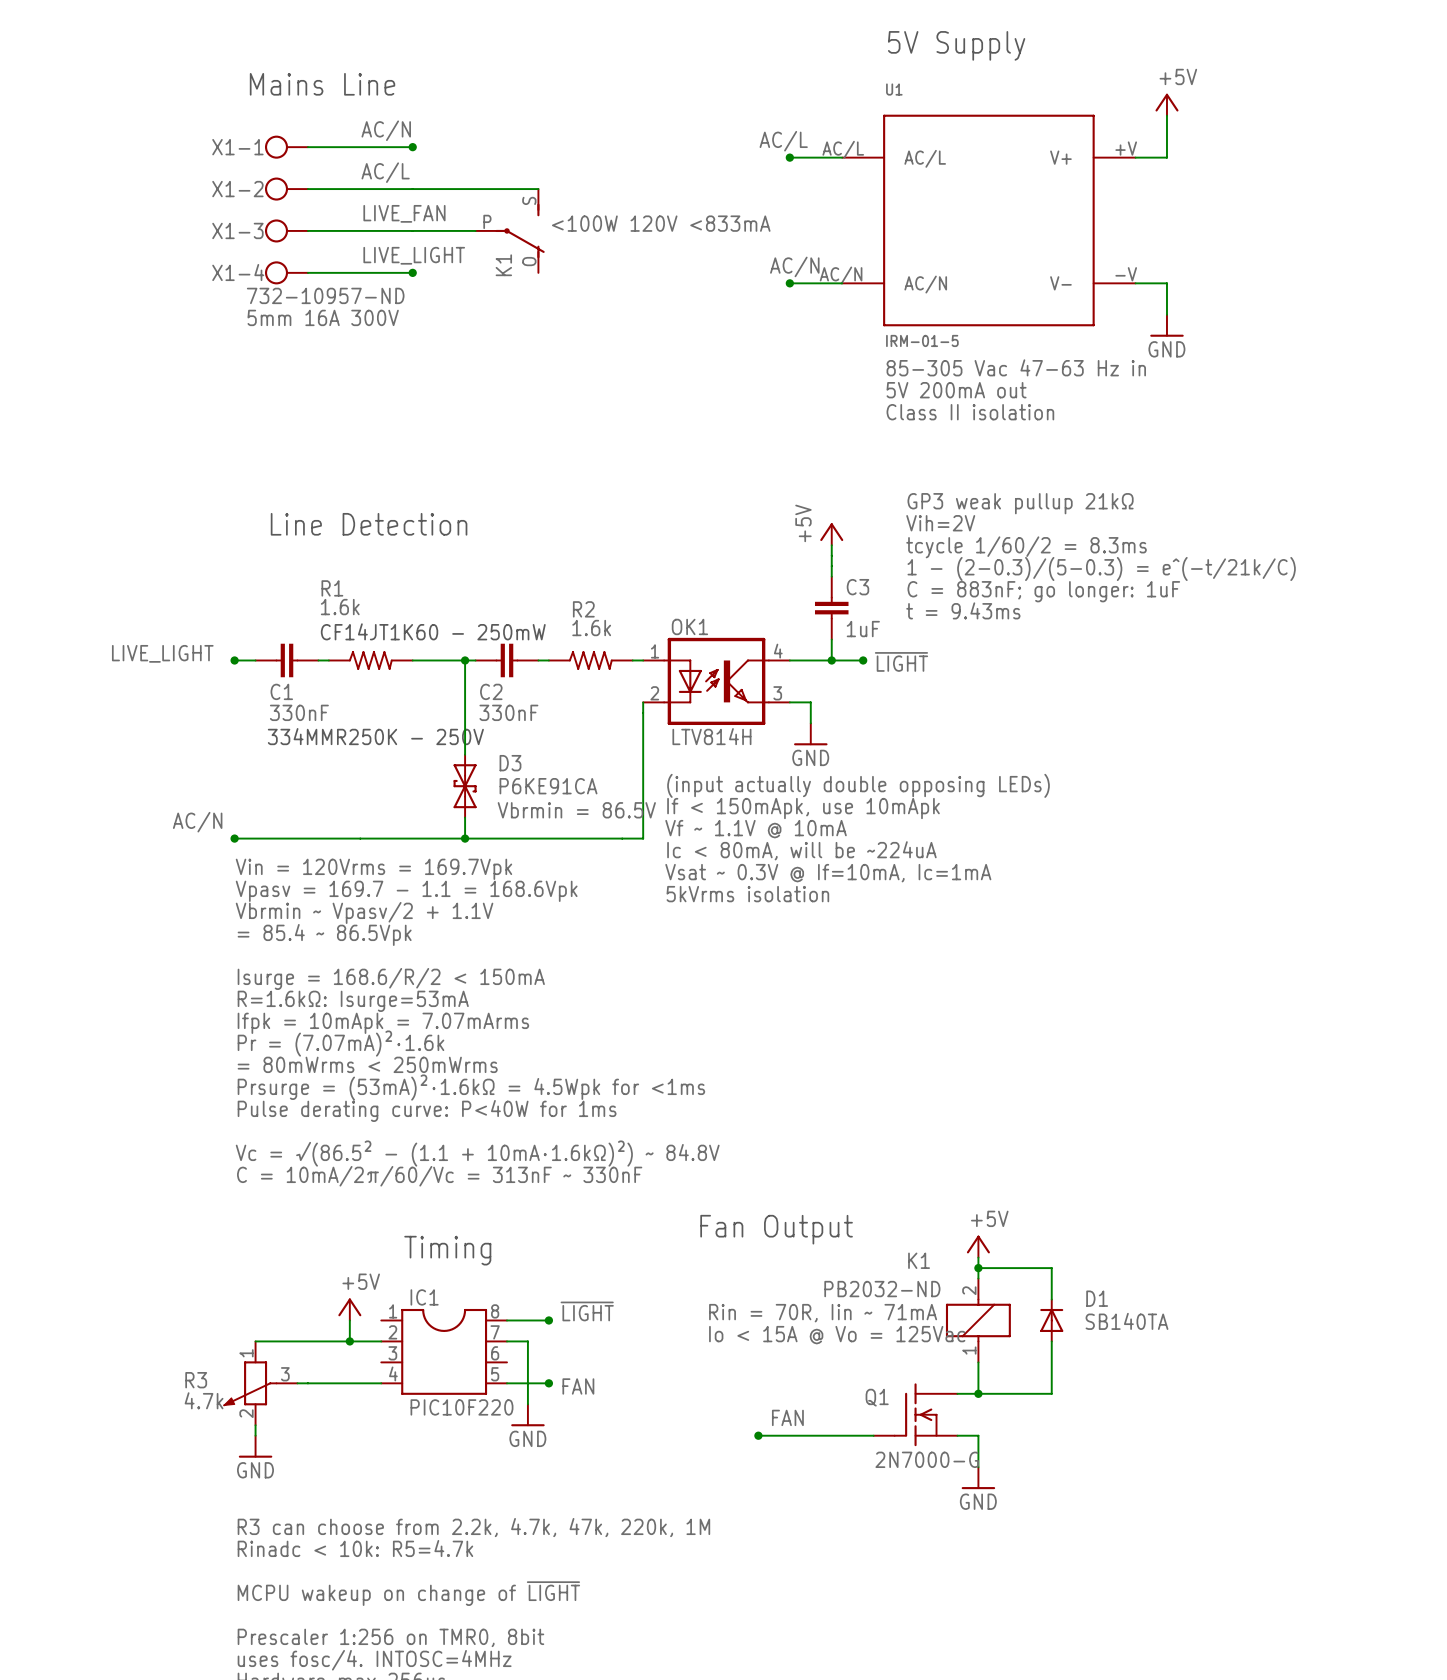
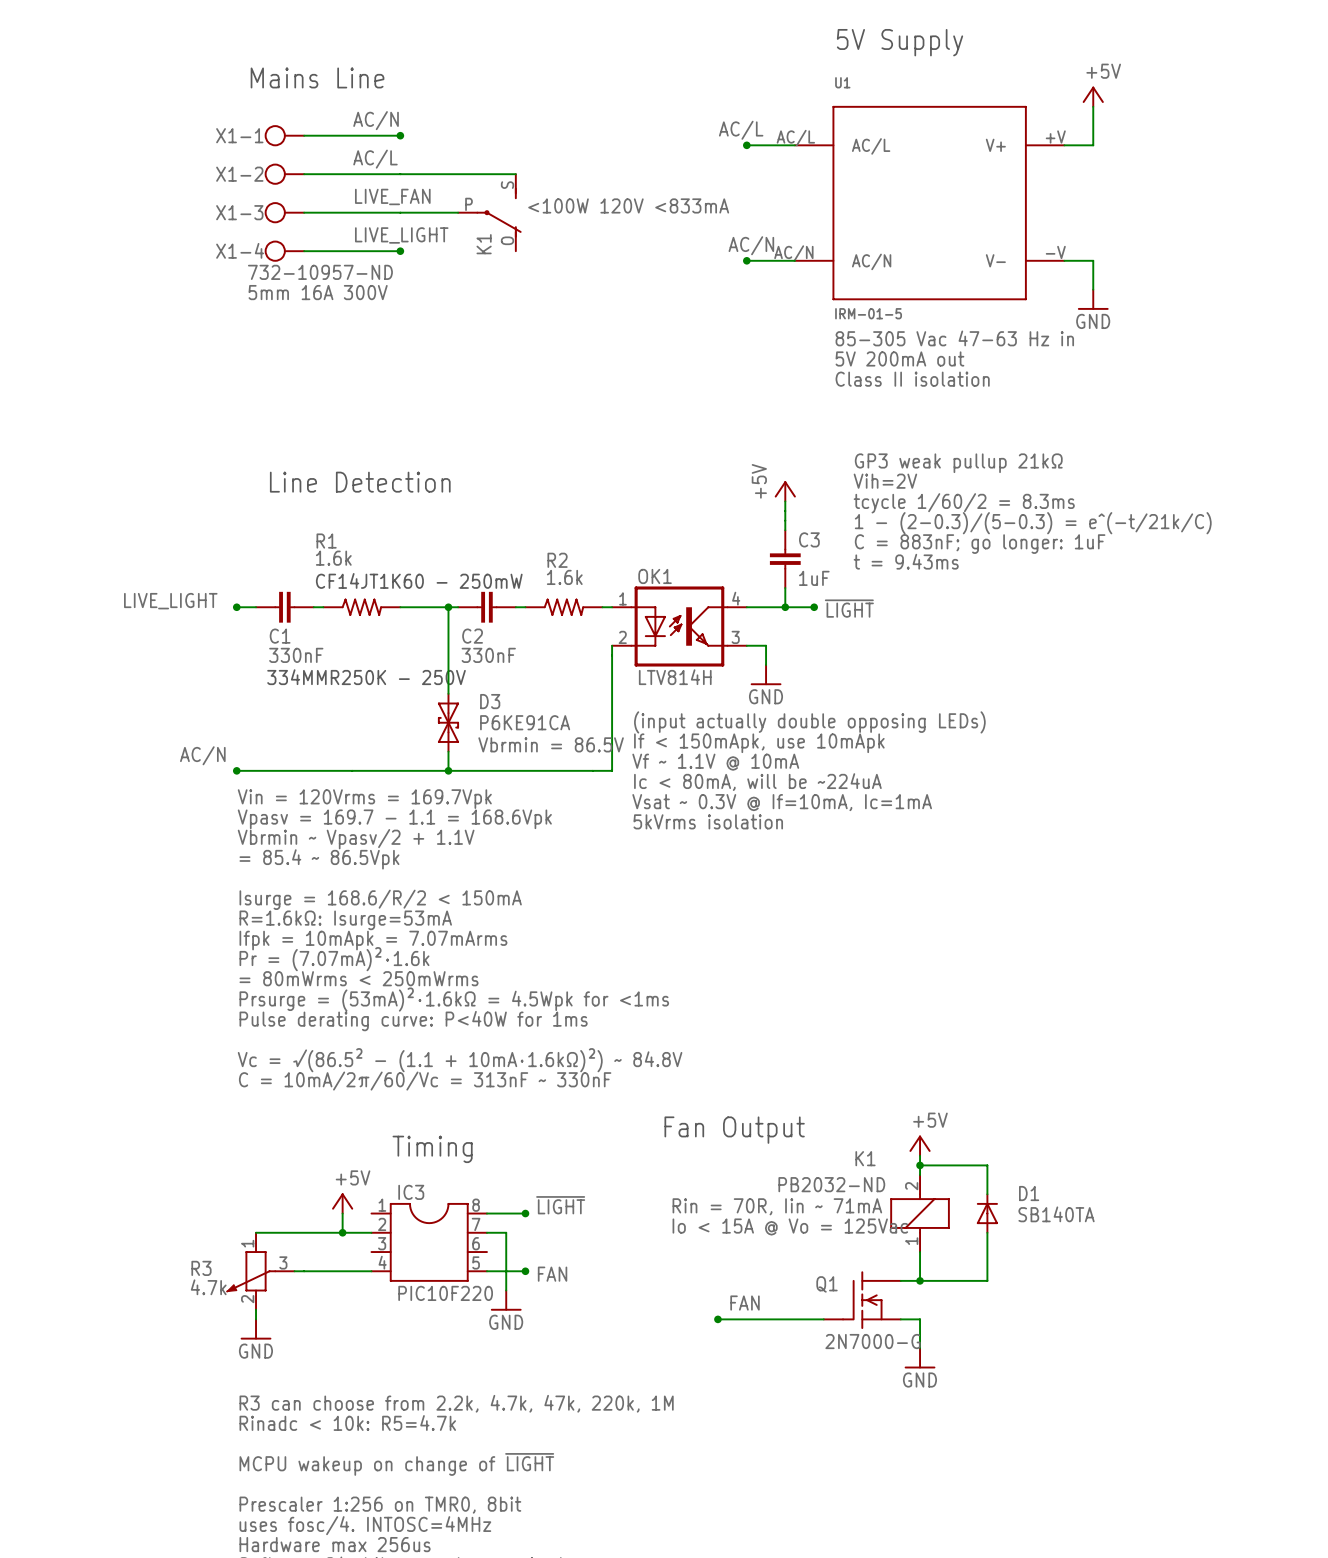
IC1 name: IC1 (424, 1297) -> IC3 (411, 1192)

